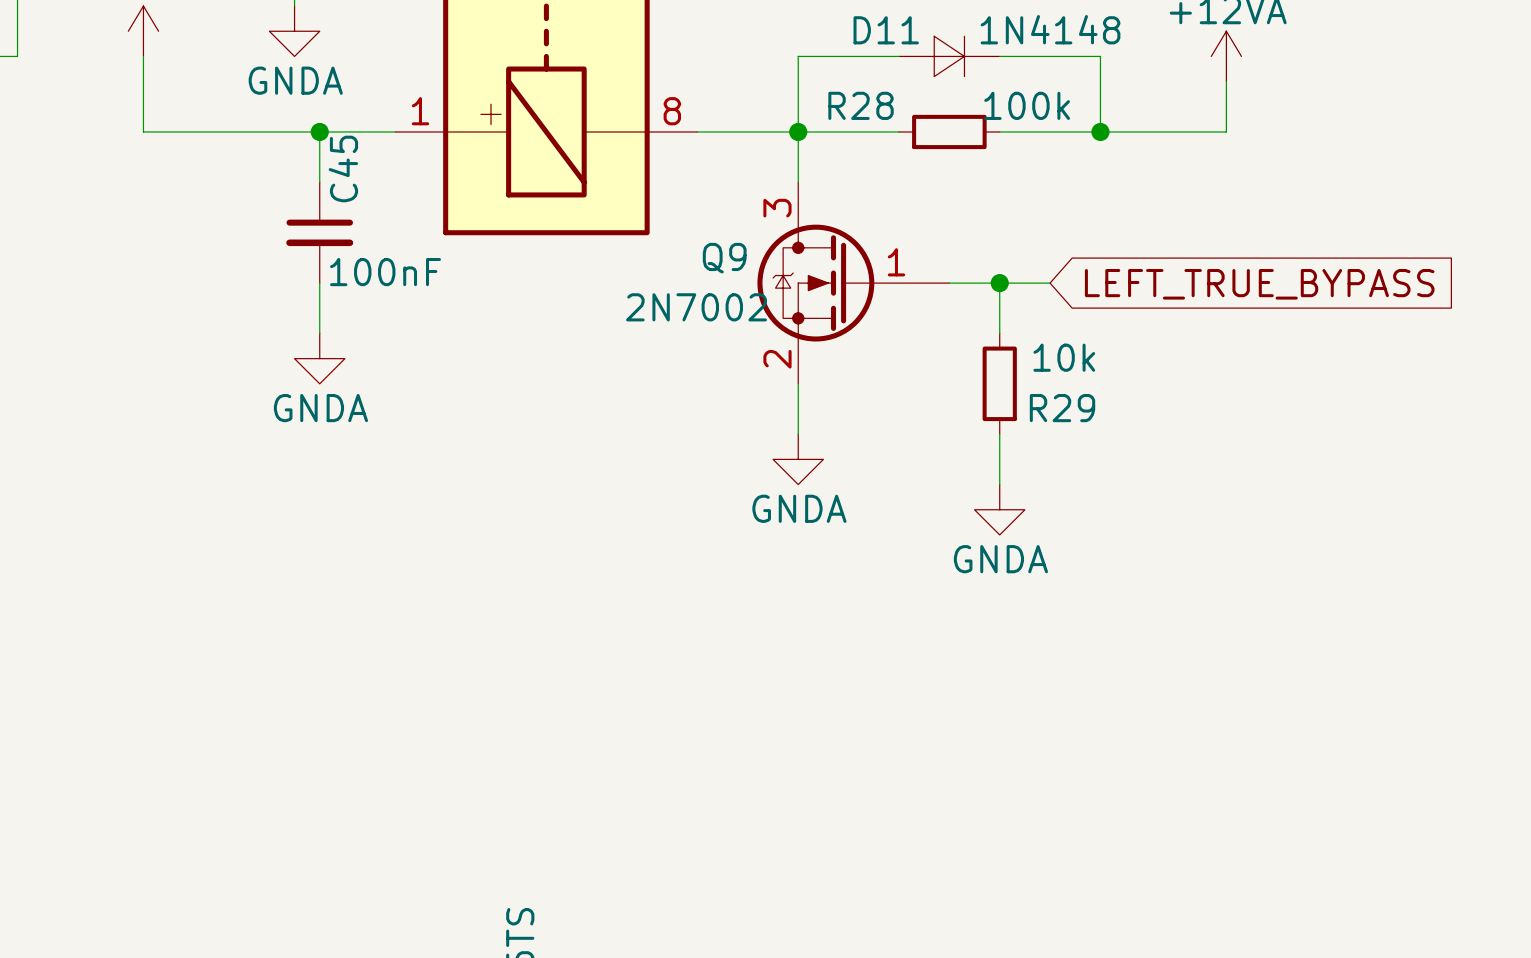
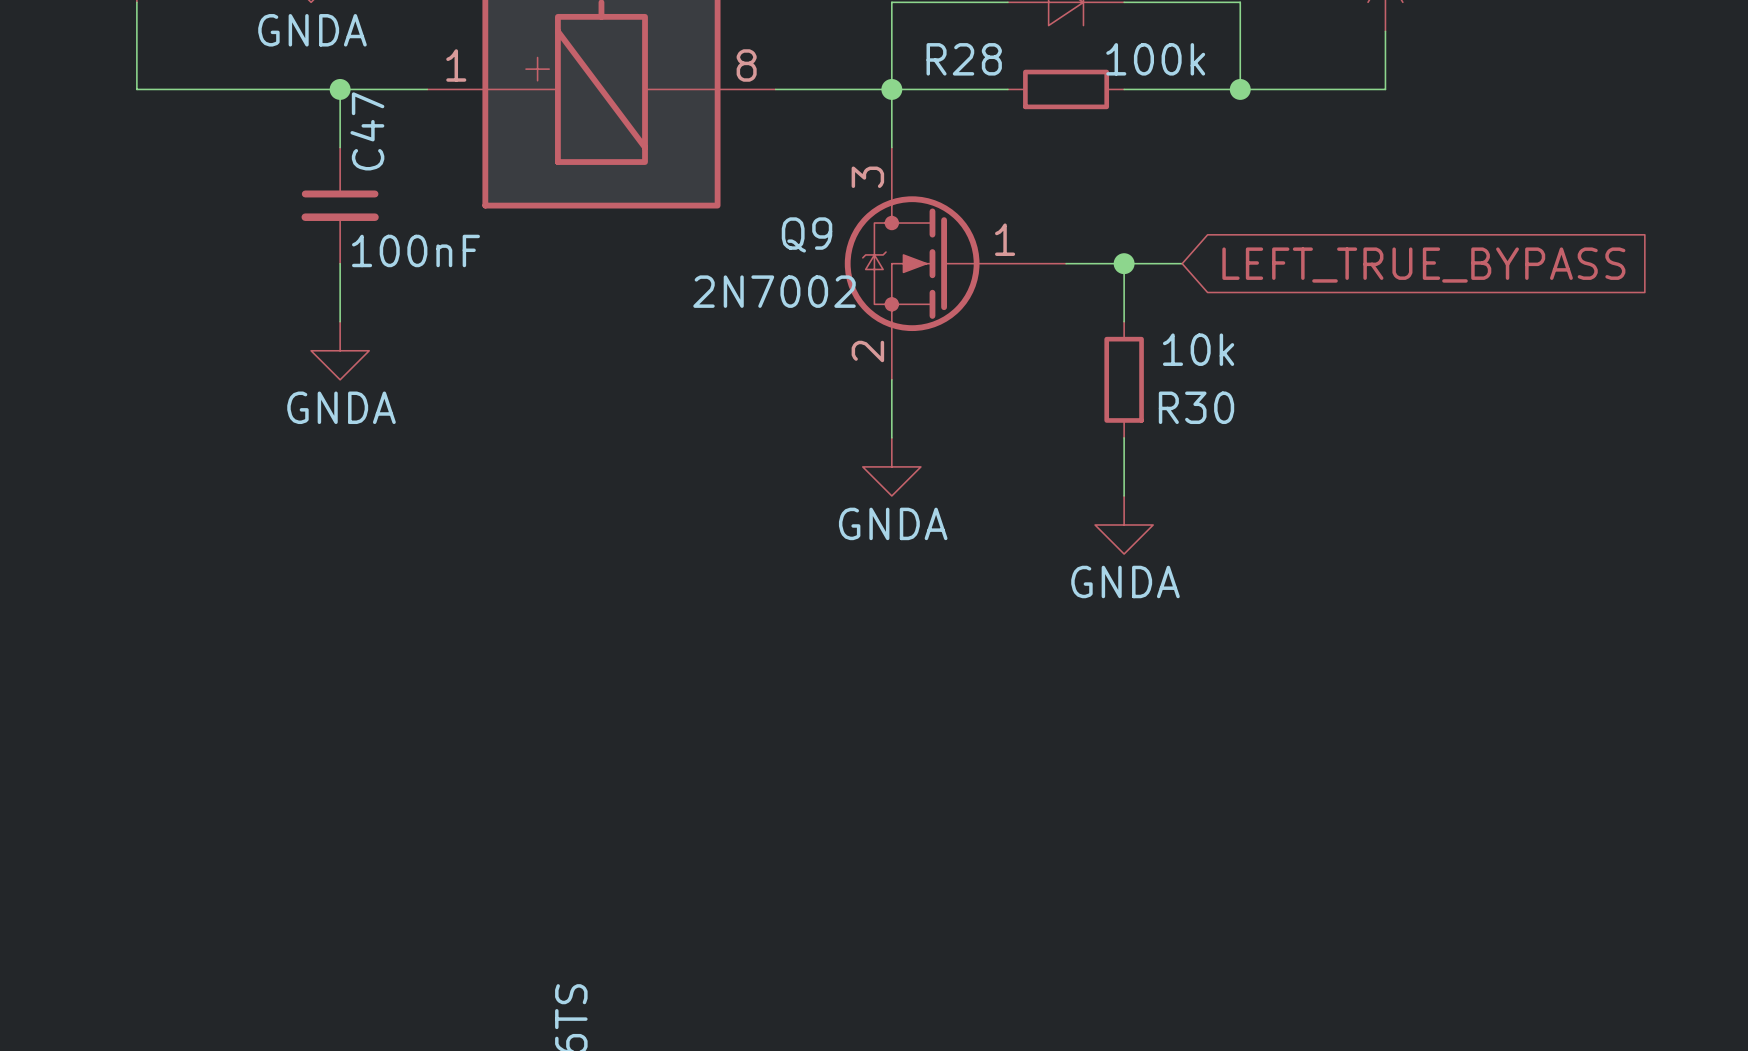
C45 name: C45 (343, 168) -> C47 (367, 131)
R29 name: R29 (1062, 408) -> R30 (1196, 407)

